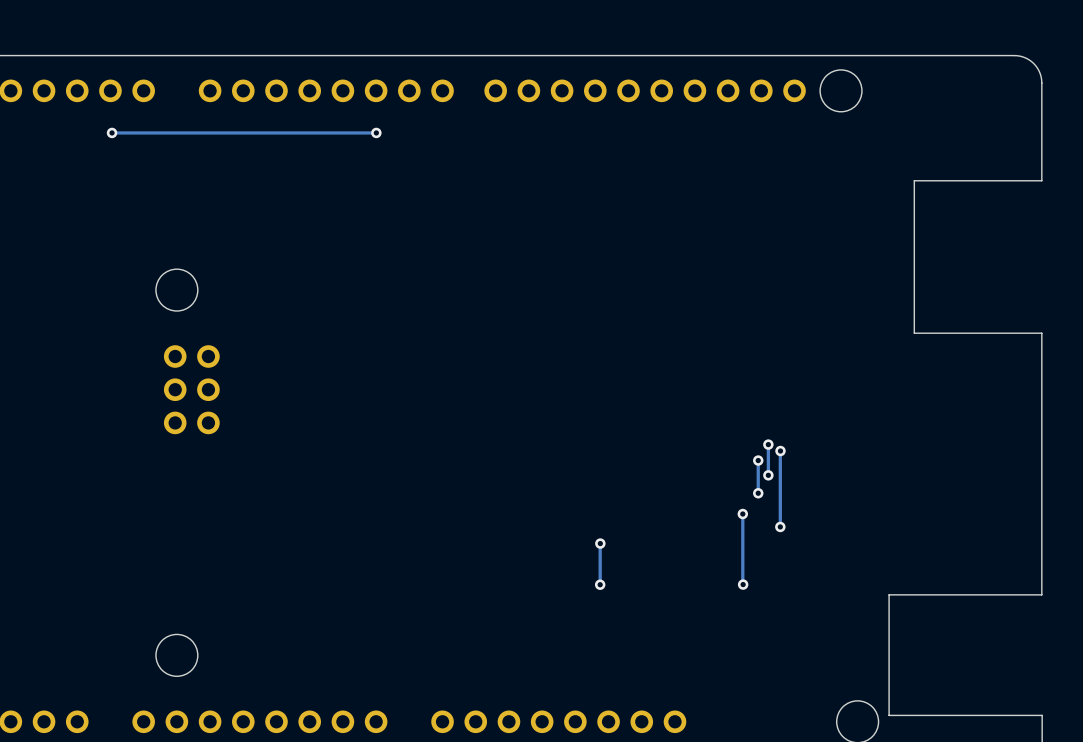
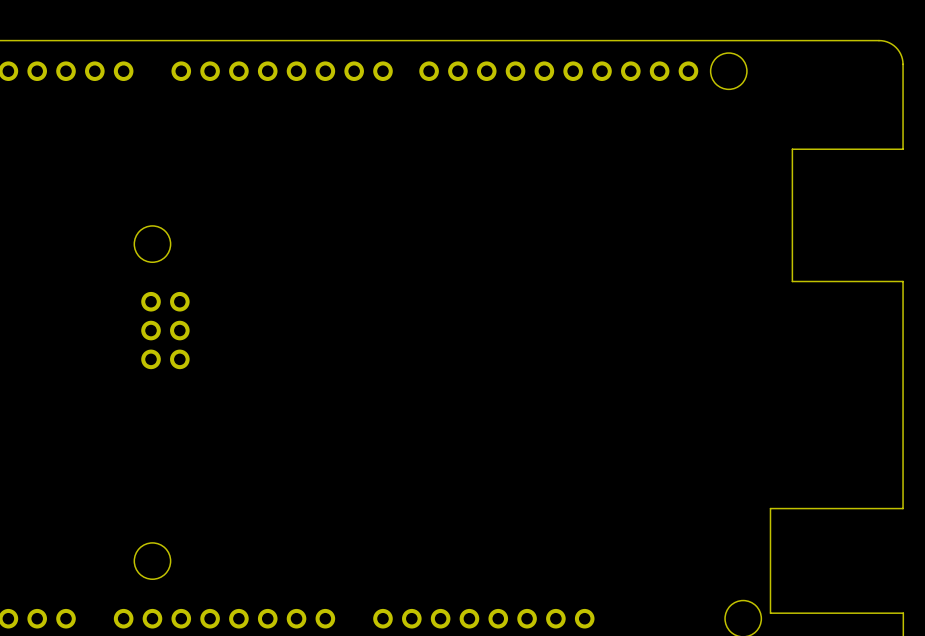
via: (112, 132) -> none
track: (376, 132) (112, 132) -> none
via: (376, 132) -> none
track: (768, 444) (768, 475) -> none
via: (768, 444) -> none
track: (780, 451) (780, 526) -> none
via: (780, 451) -> none
track: (758, 460) (758, 493) -> none
via: (758, 460) -> none
via: (768, 475) -> none
via: (758, 493) -> none
track: (742, 514) (743, 584) -> none
via: (742, 514) -> none
via: (780, 526) -> none
track: (600, 543) (600, 584) -> none
via: (600, 543) -> none
via: (600, 584) -> none
via: (743, 584) -> none

